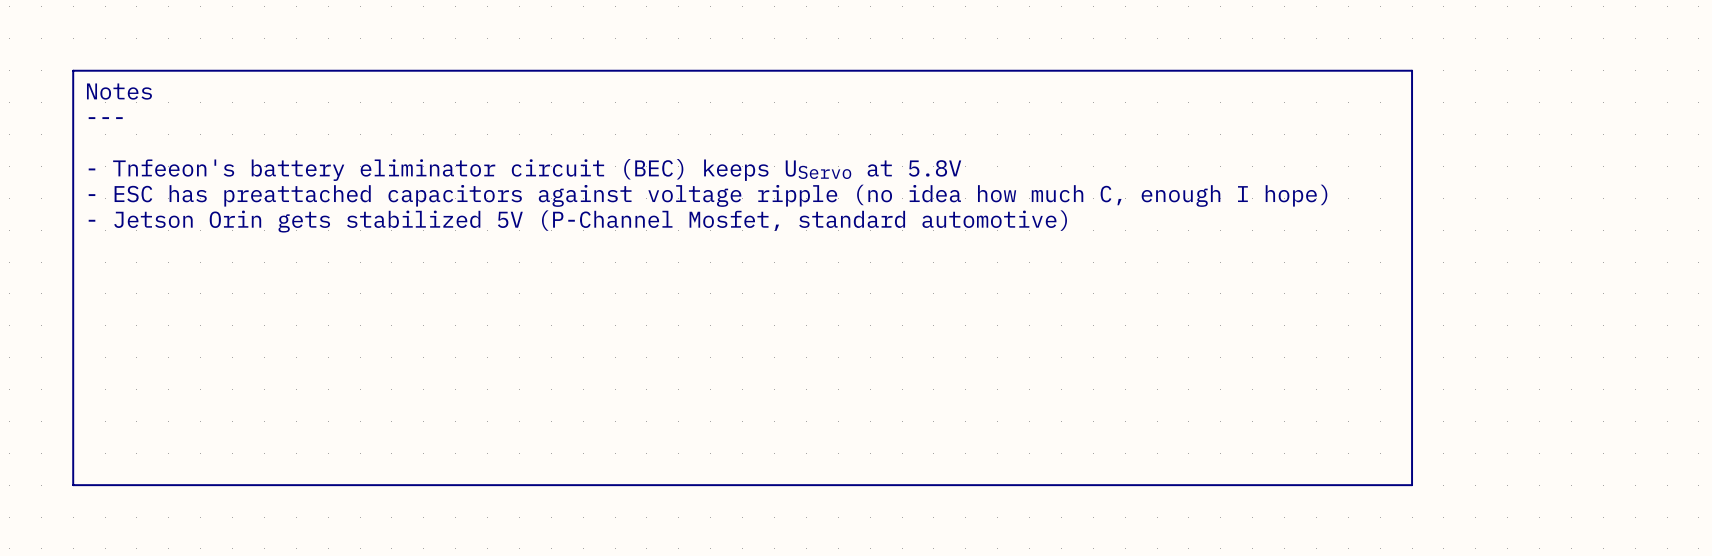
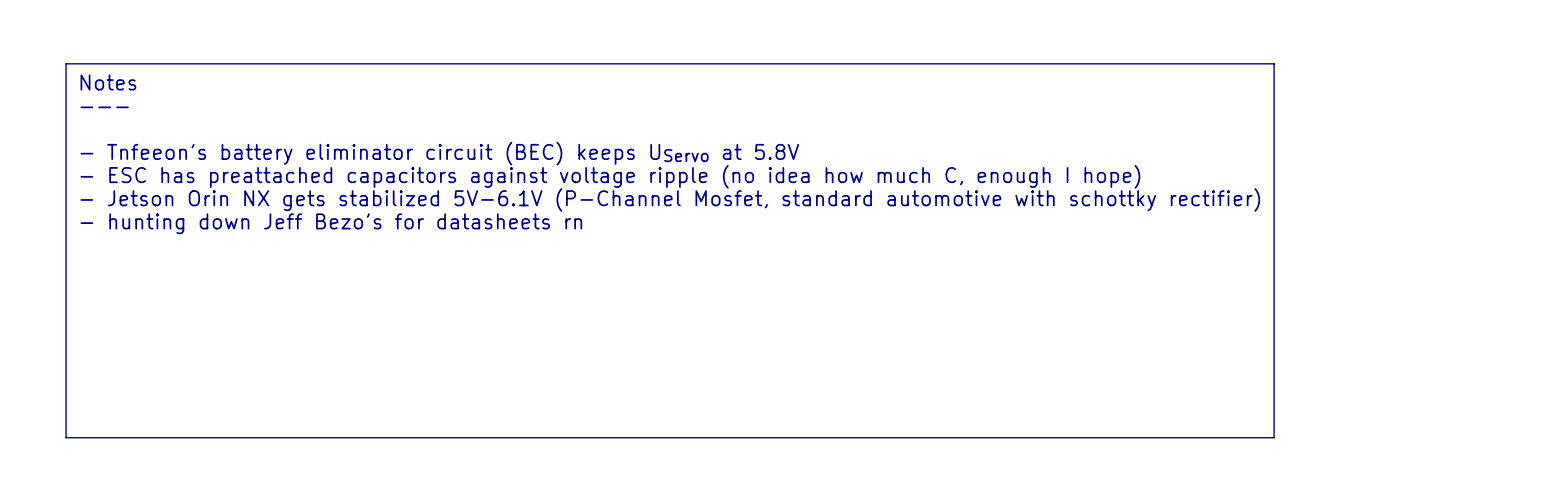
text: - Jetson Orin gets stabilized 5V (P-Channel Mosfet, standard automotive) (577, 221) -> - Jetson Orin NX gets stabilized 5V-6.1V (P-Channel Mosfet, standard automotive with schottky rectifier) (670, 199)
text: none -> - hunting down Jeff Bezo's for datasheets rn (331, 223)

